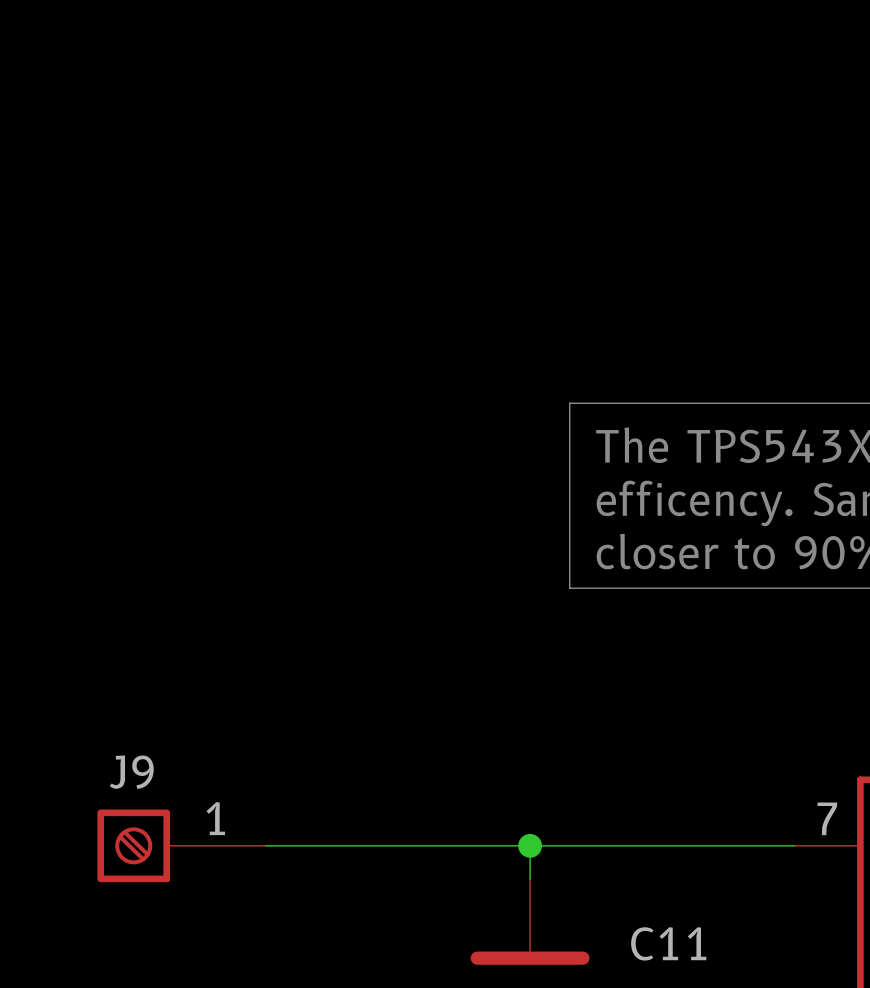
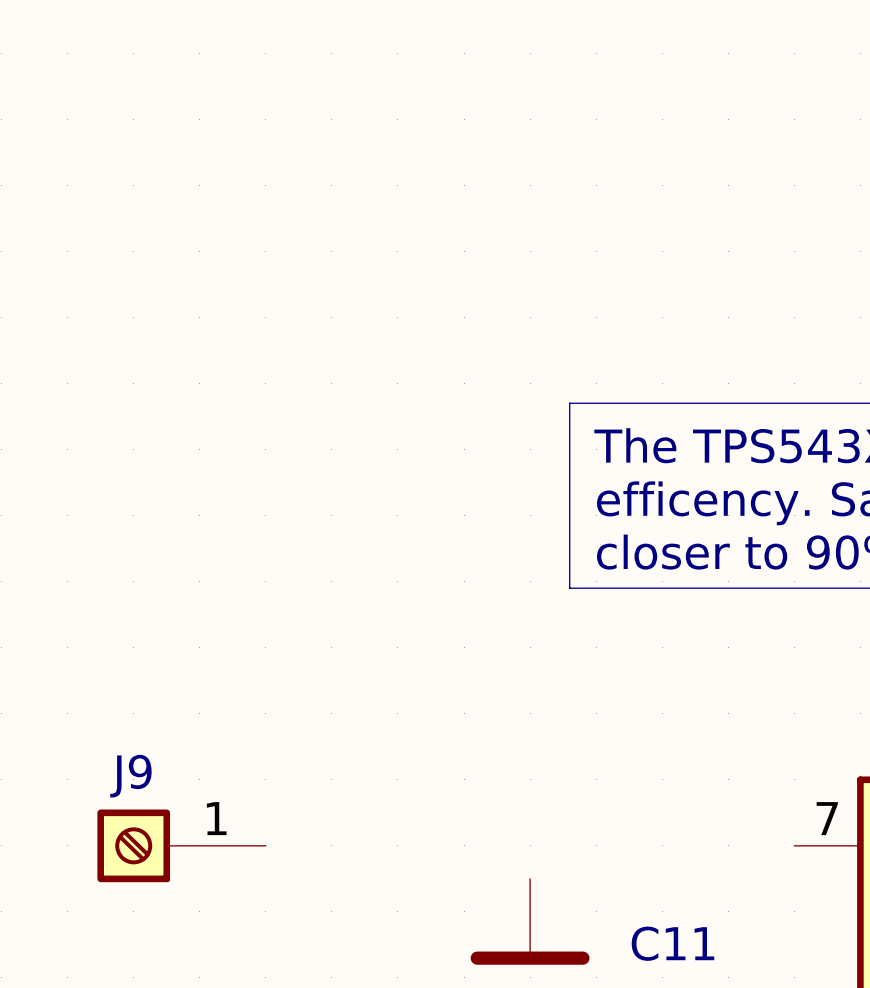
wire: (265, 845) (794, 845) -> none
wire: (530, 845) (530, 878) -> none
junction: (530, 845) -> none

